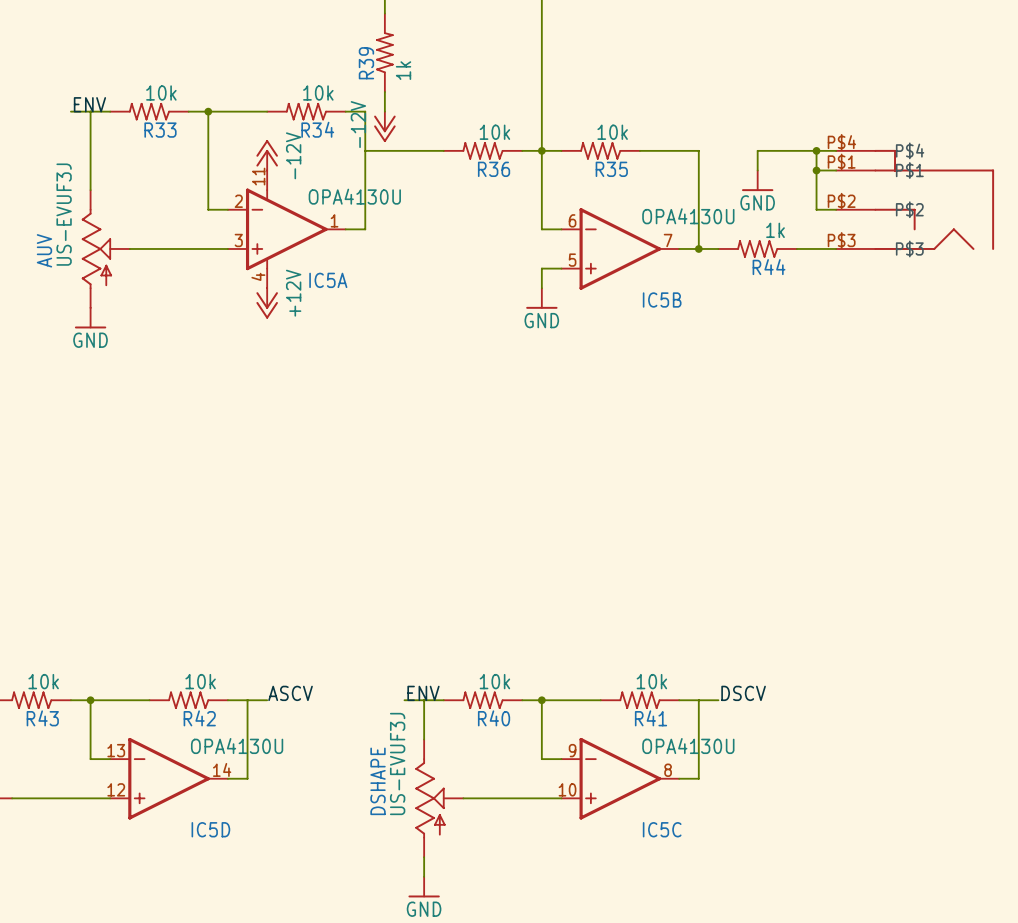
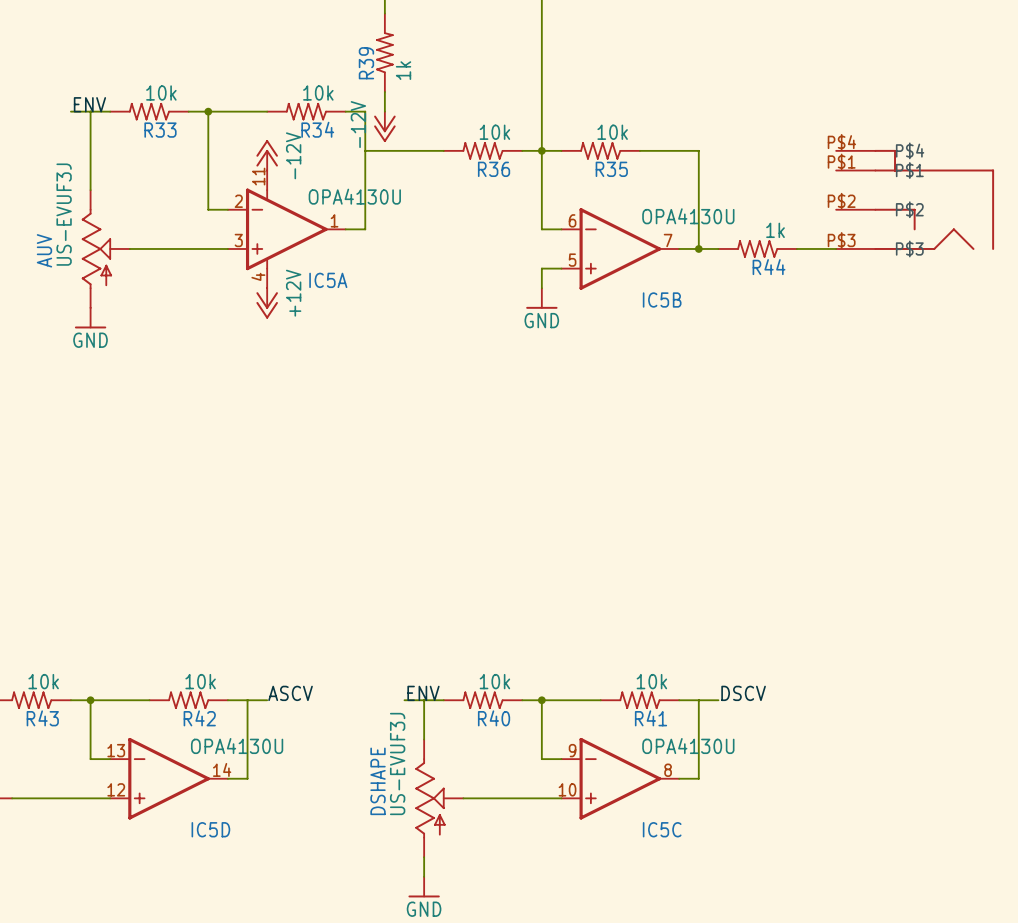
wire: (816, 150) (816, 209) (836, 209) -> none
junction: (816, 150) -> none
wire: (836, 150) (757, 150) (757, 170) -> none
wire: (816, 170) (836, 170) -> none
junction: (816, 170) -> none
power symbol: GND (757, 180) -> none

